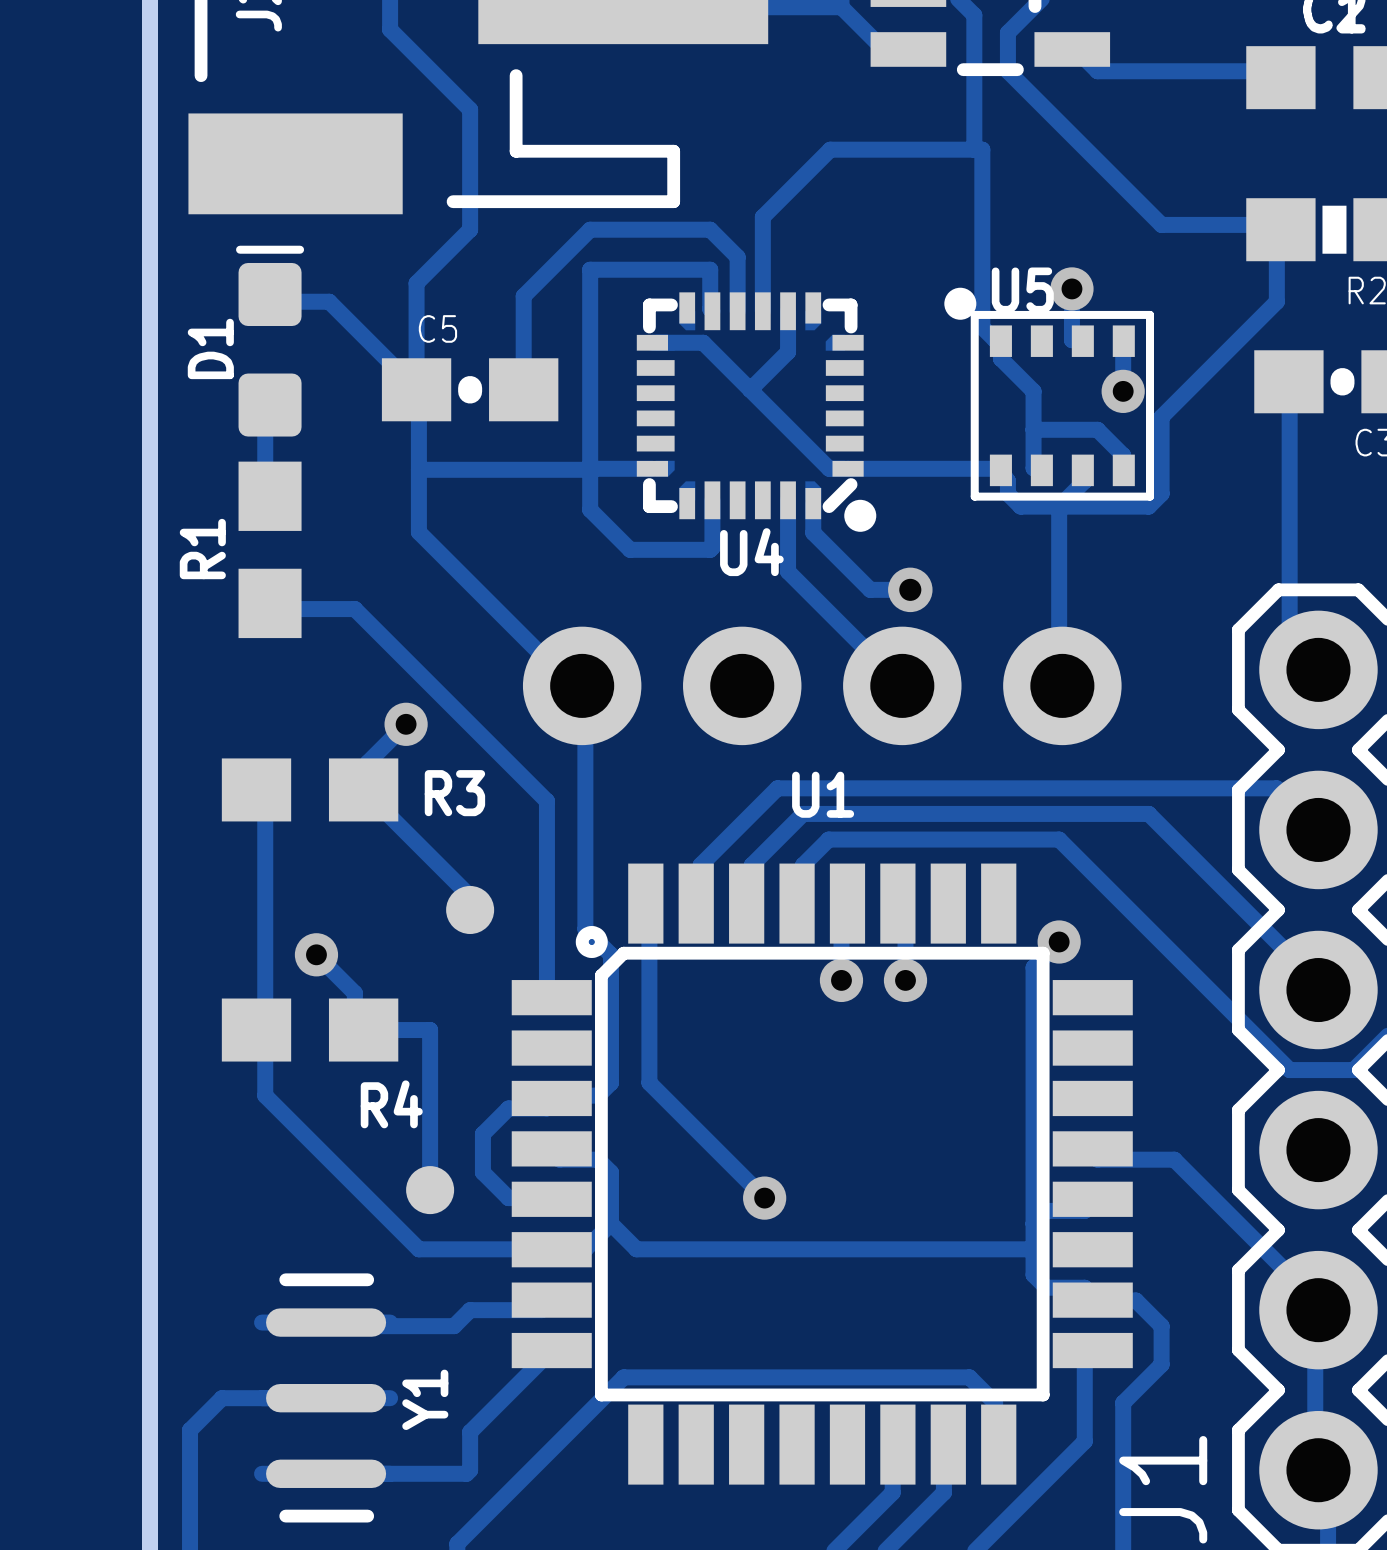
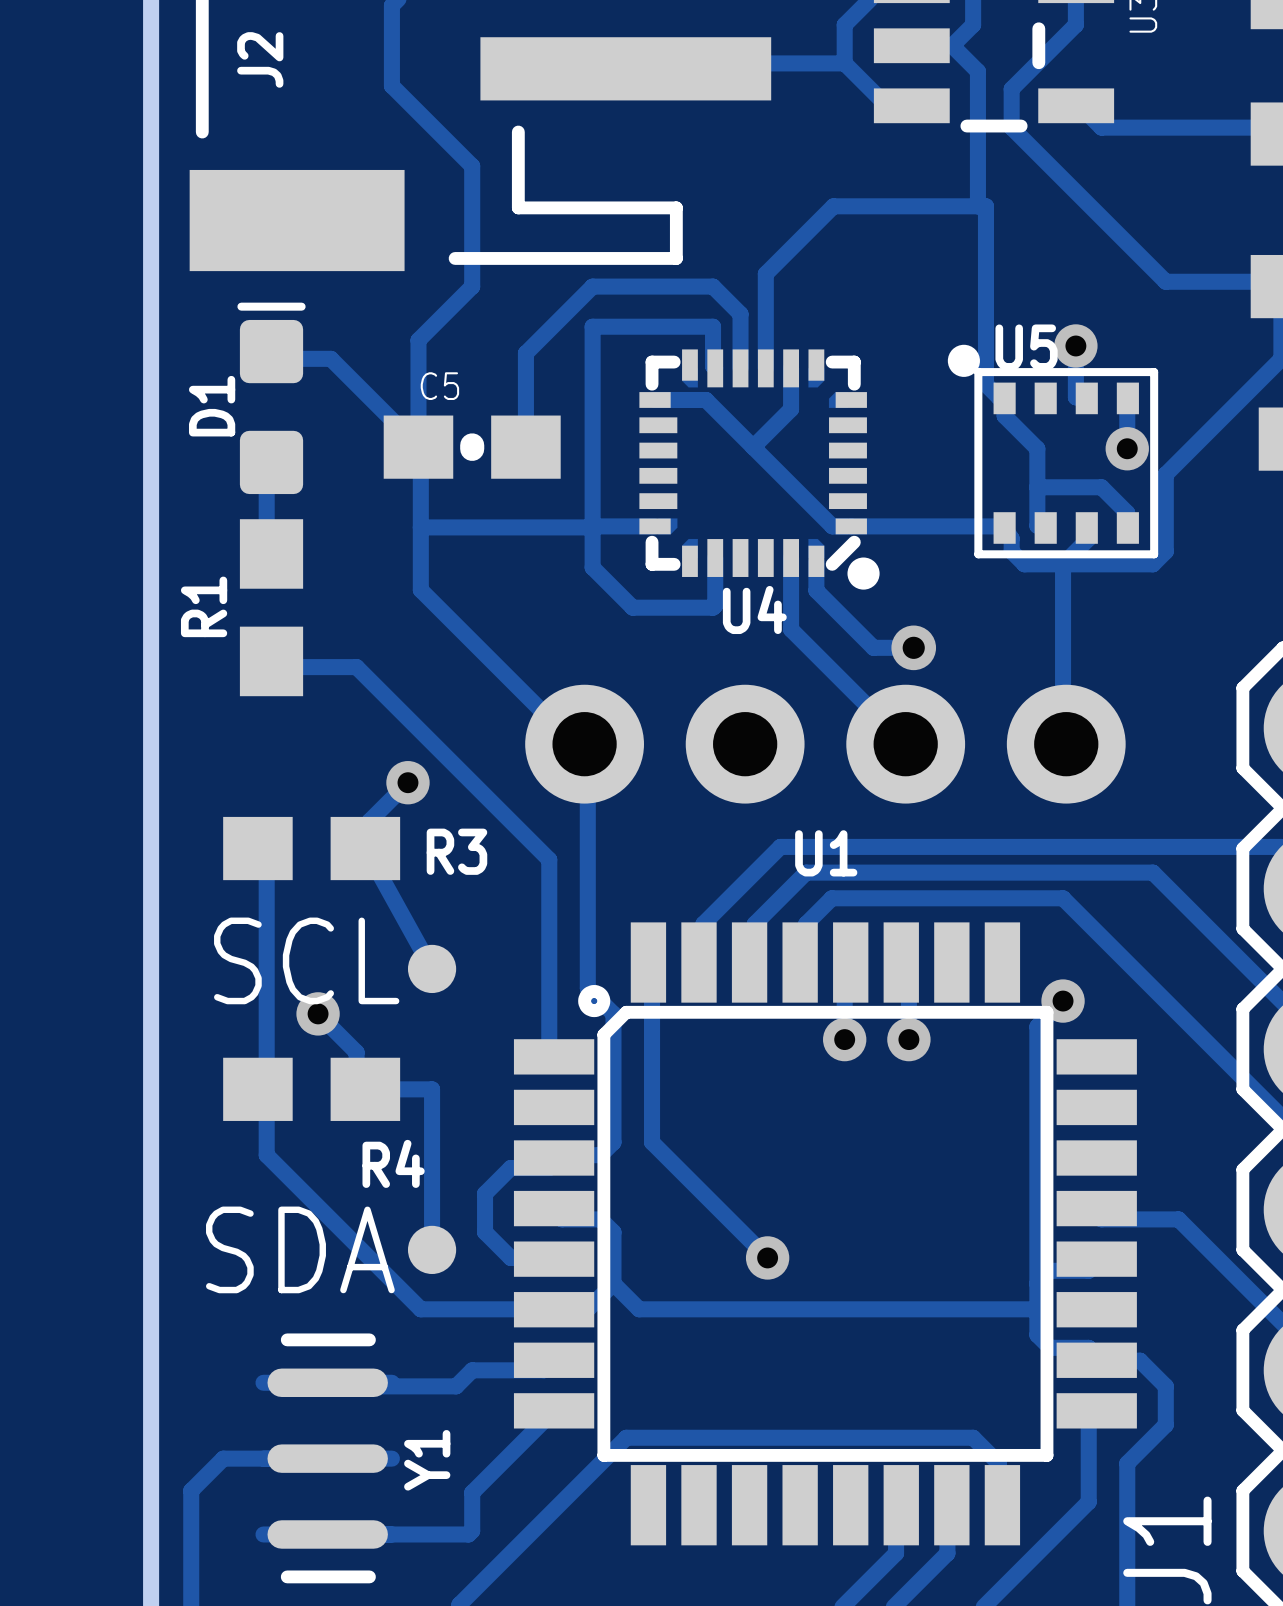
track: (363, 789) (470, 896) (470, 909) -> (365, 848) (432, 968)
text: none -> SCL (306, 960)
part position: (470, 909) -> (432, 968)
text: none -> SDA (300, 1249)

